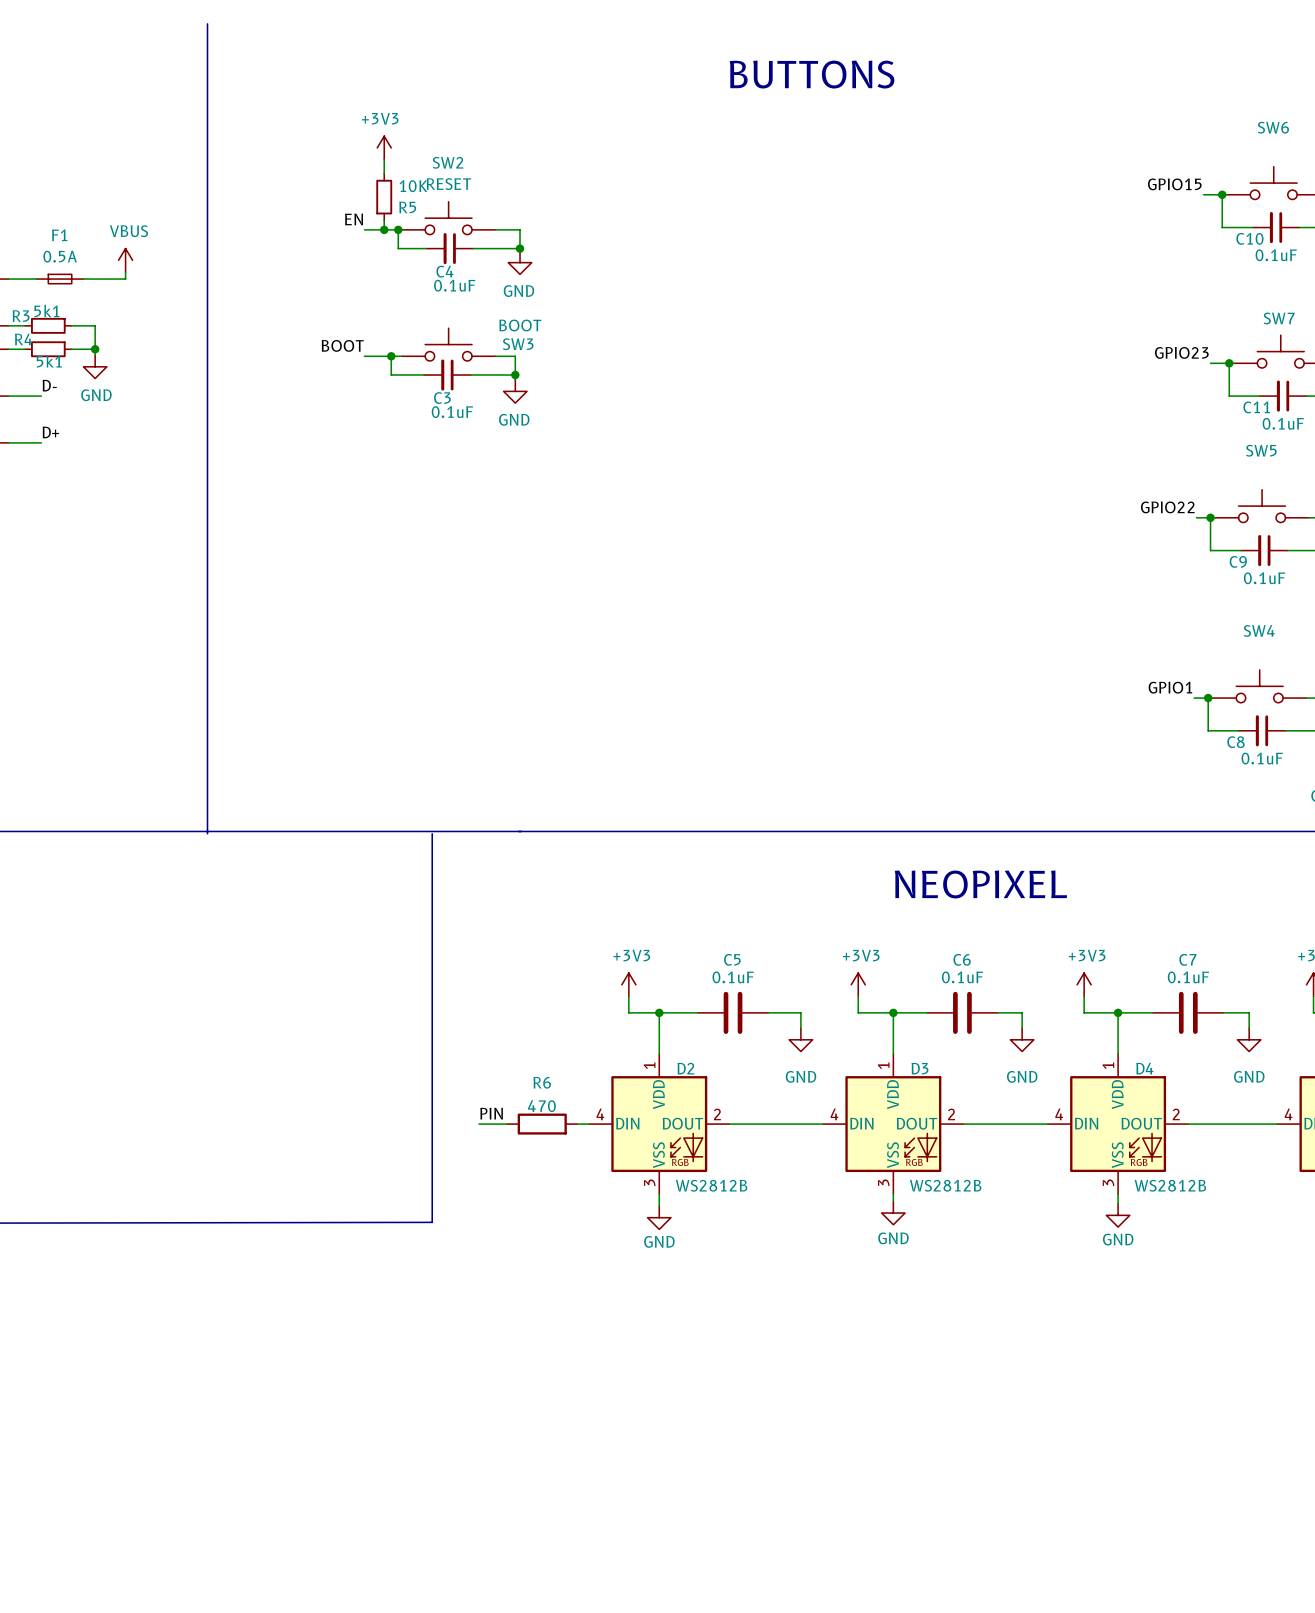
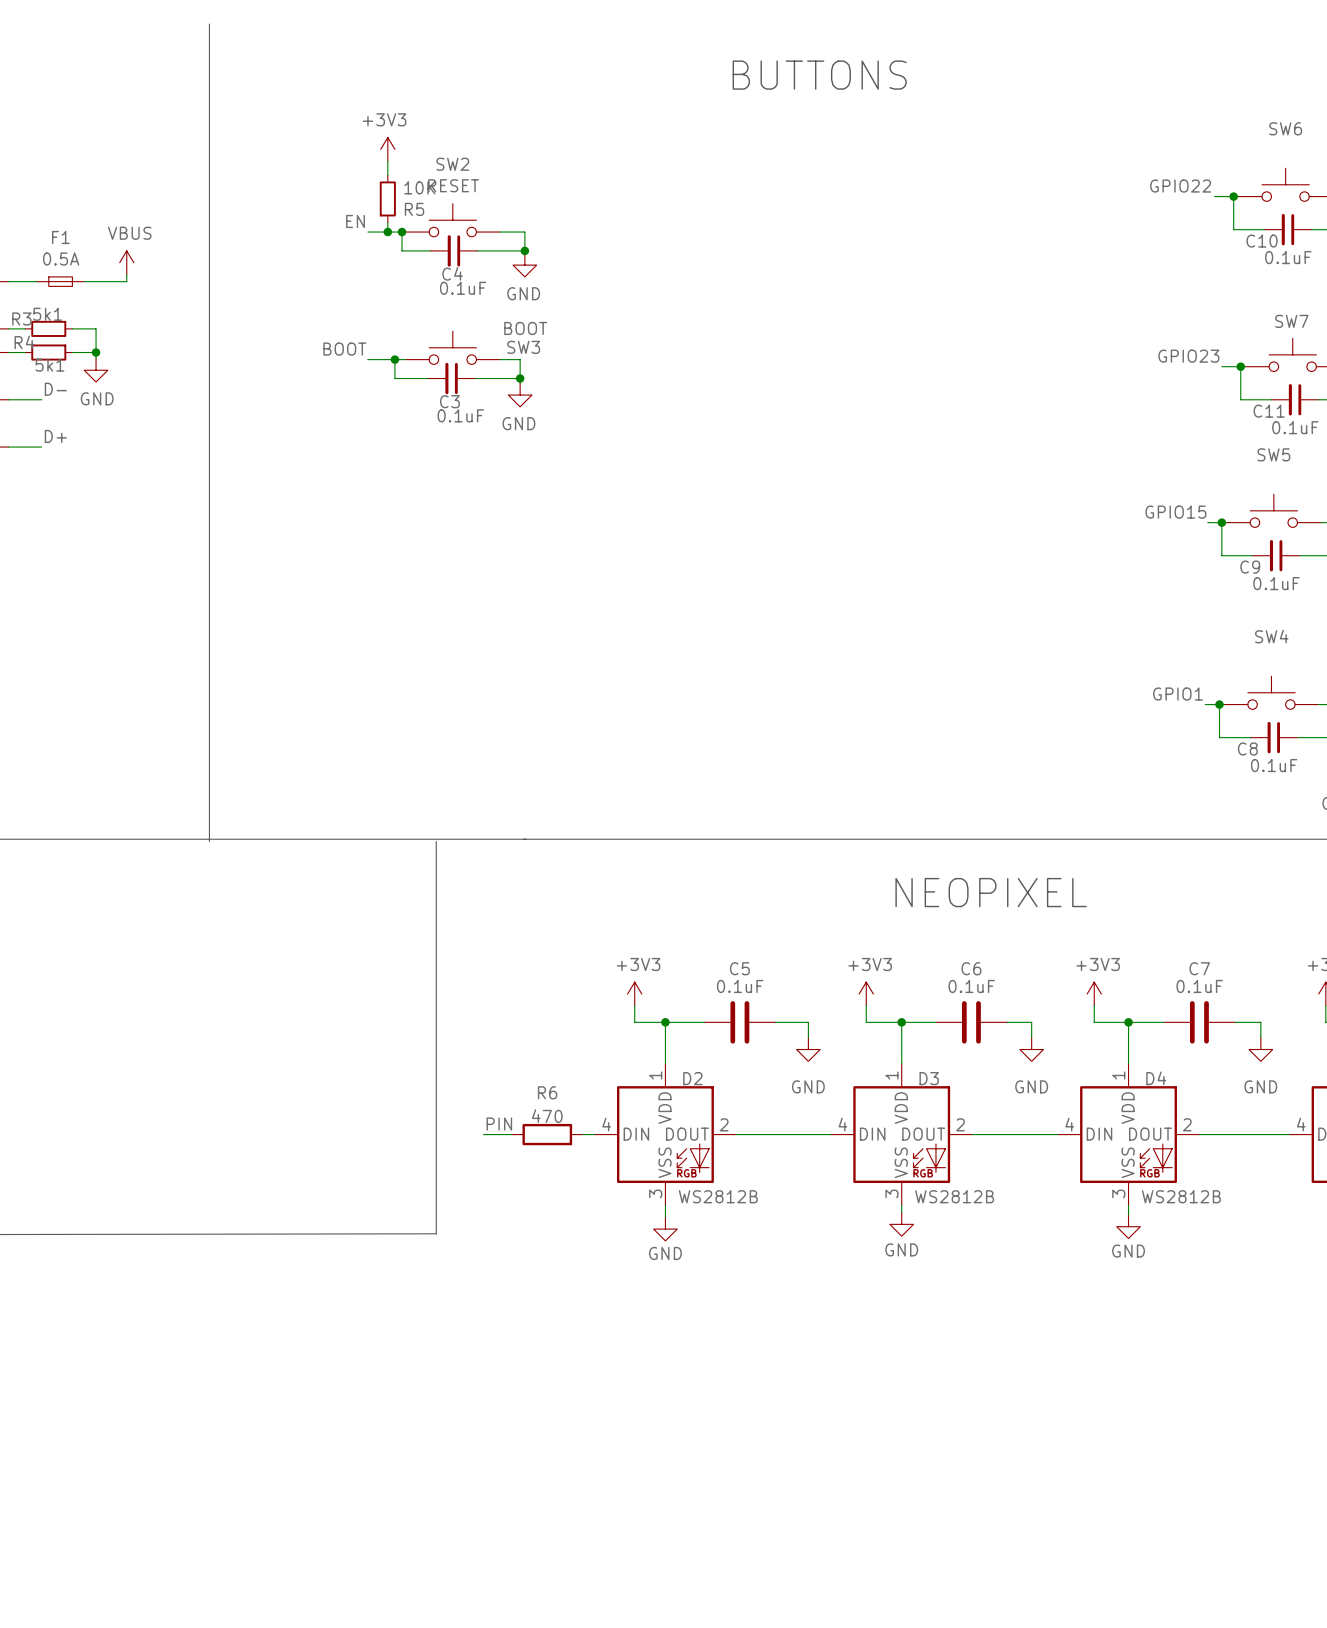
label: GPIO15 (1174, 184) -> GPIO22 (1180, 186)
label: GPIO22 (1167, 507) -> GPIO15 (1175, 512)

